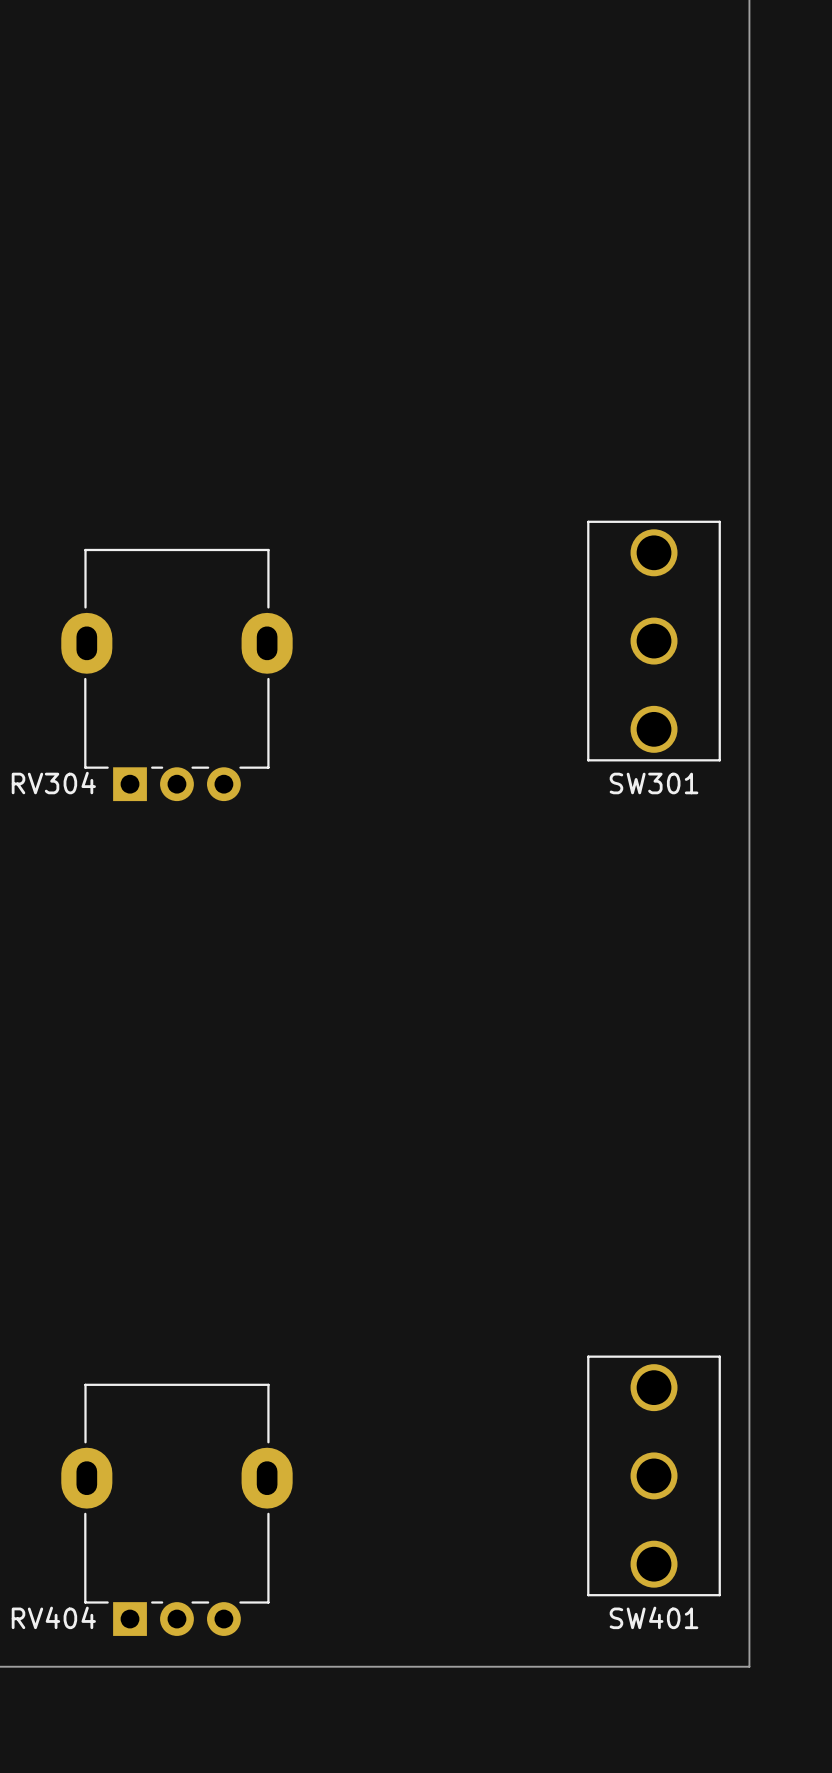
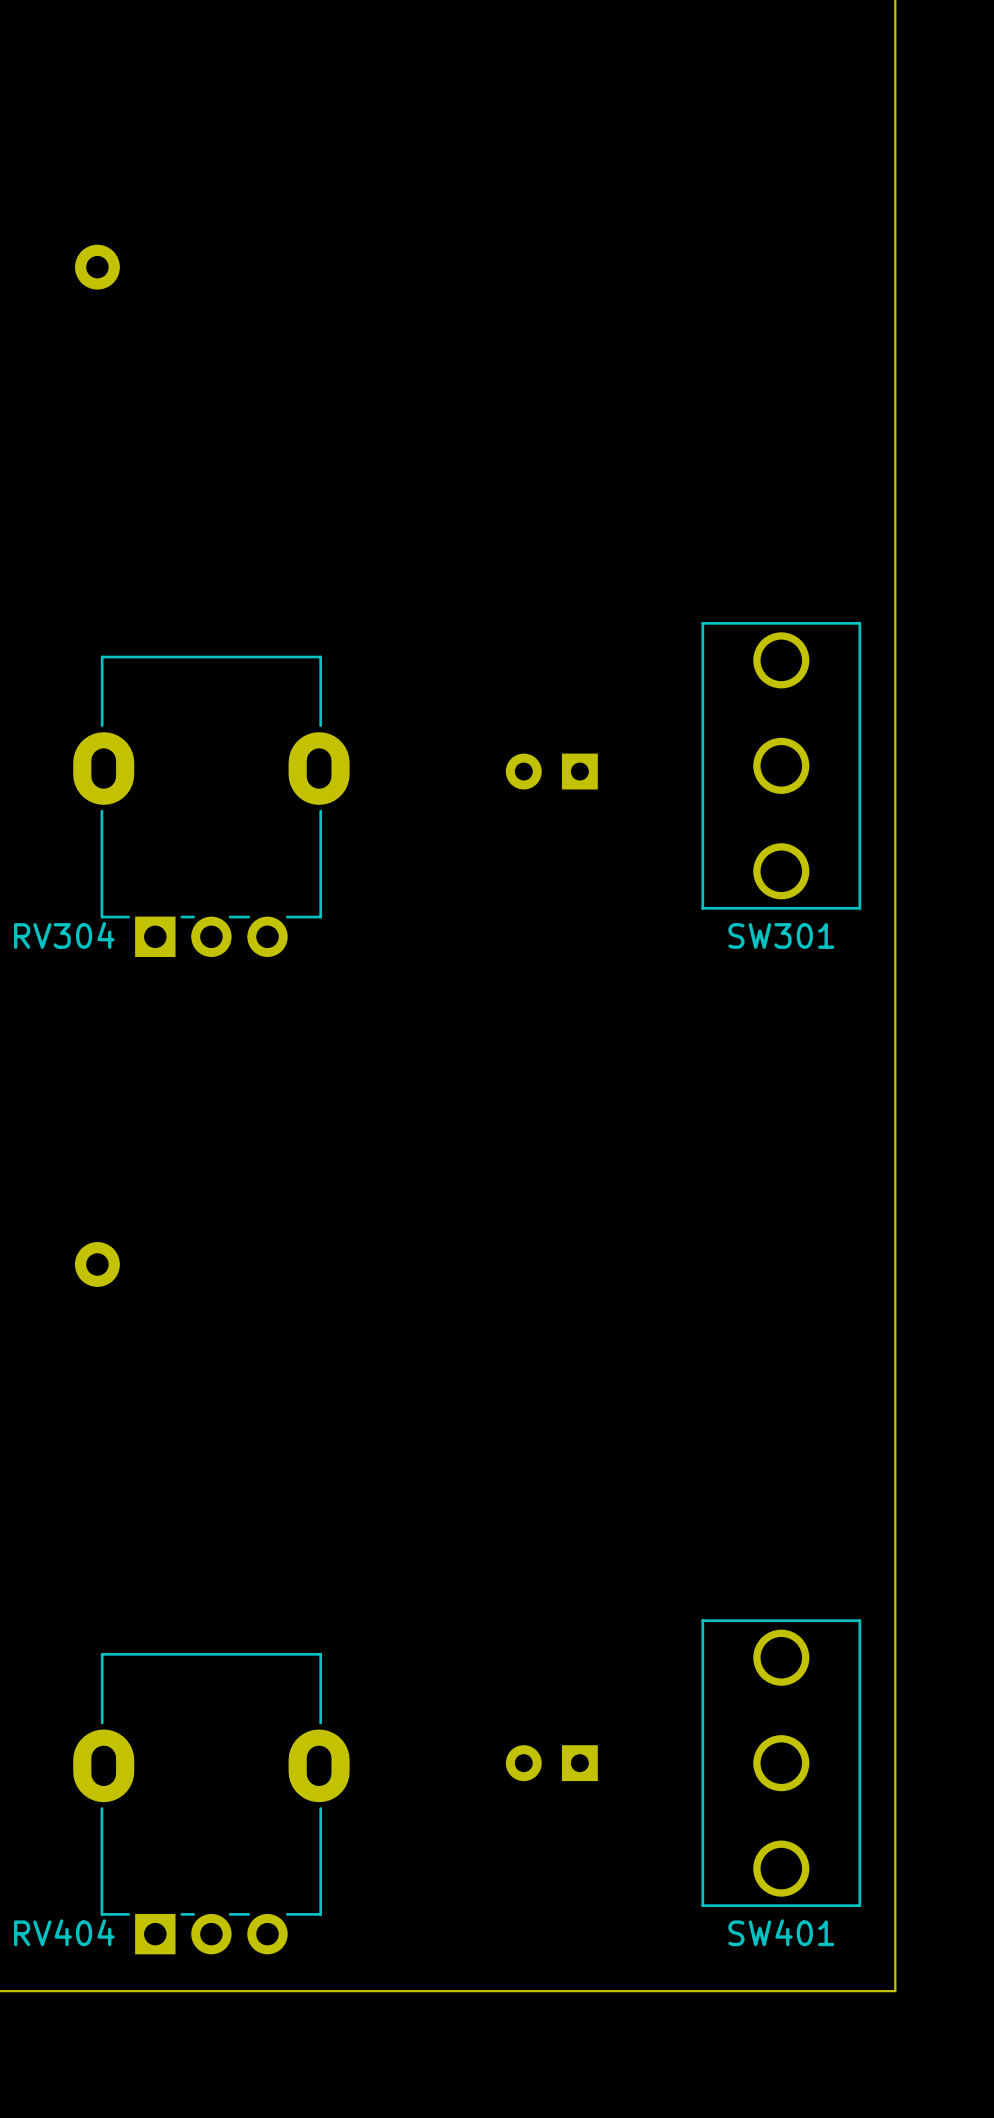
part: none -> (97, 267)
part: none -> (551, 771)
part: none -> (97, 1264)
part: none -> (551, 1763)

